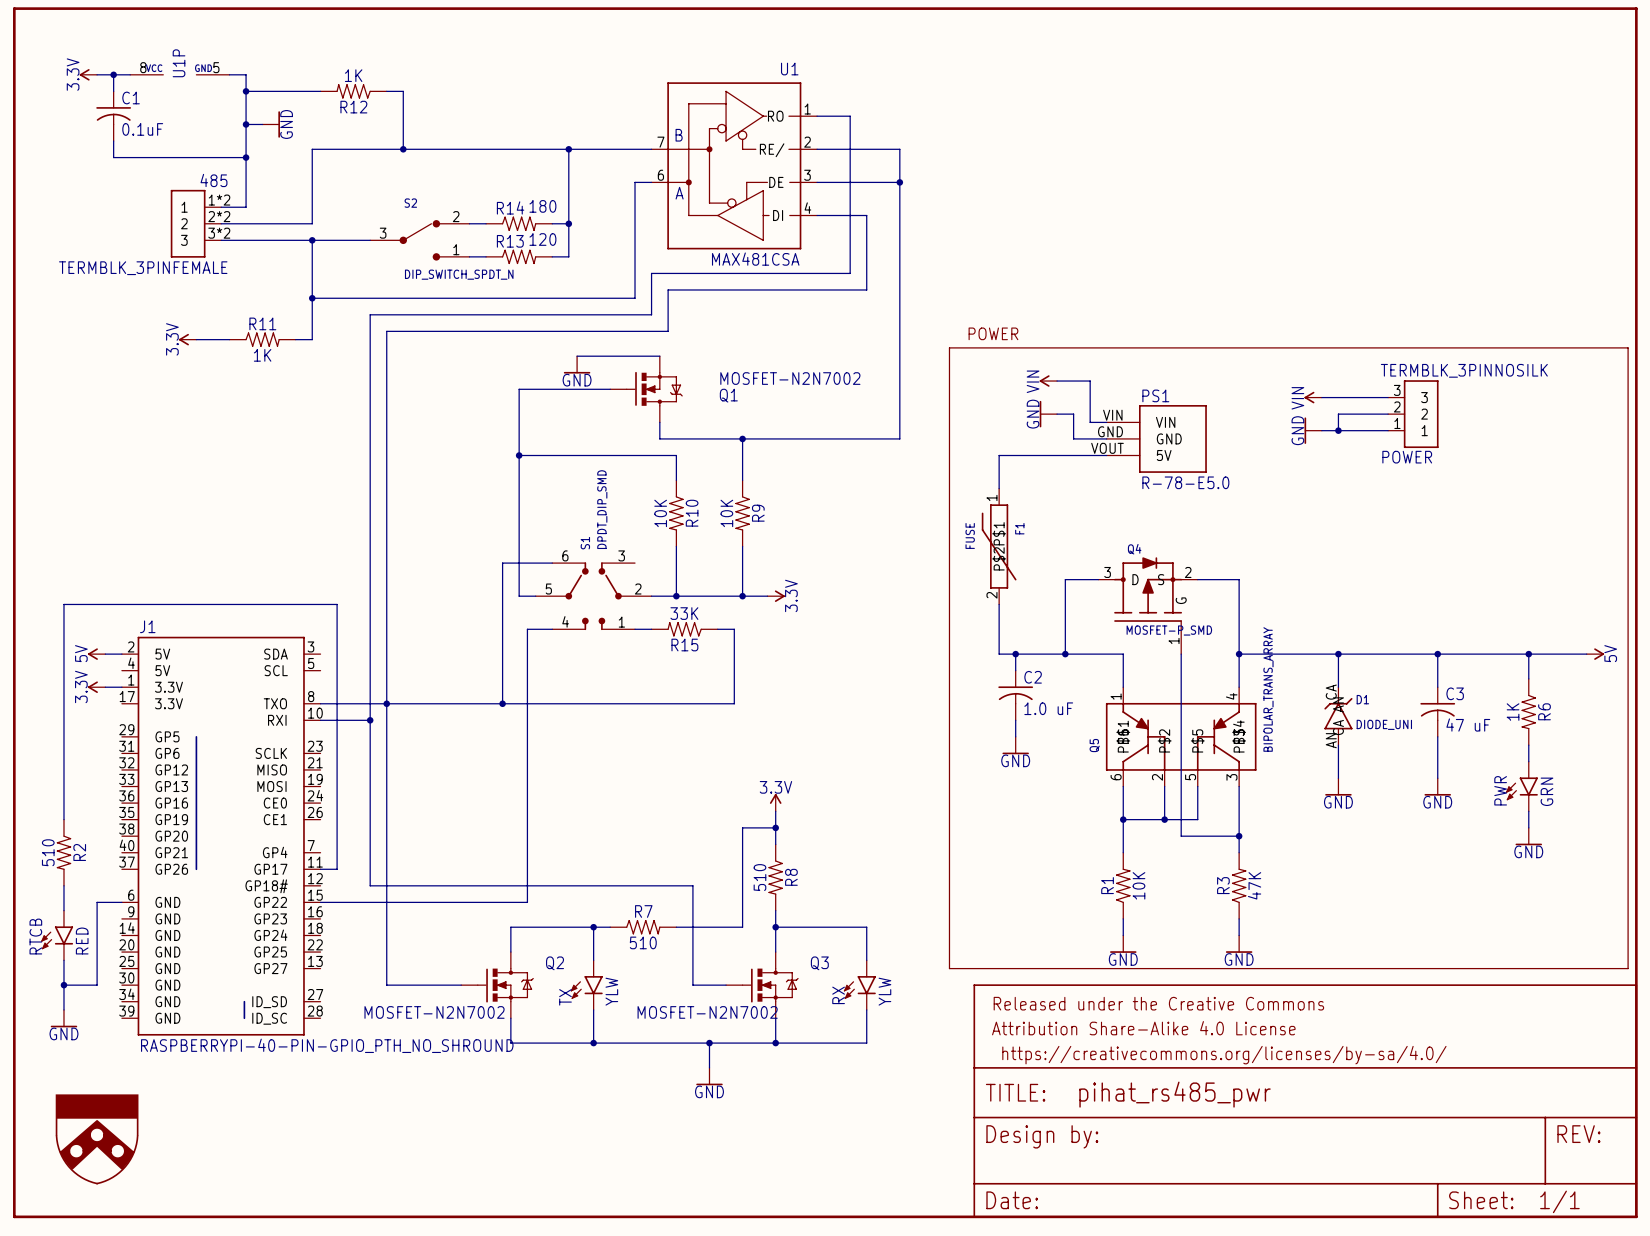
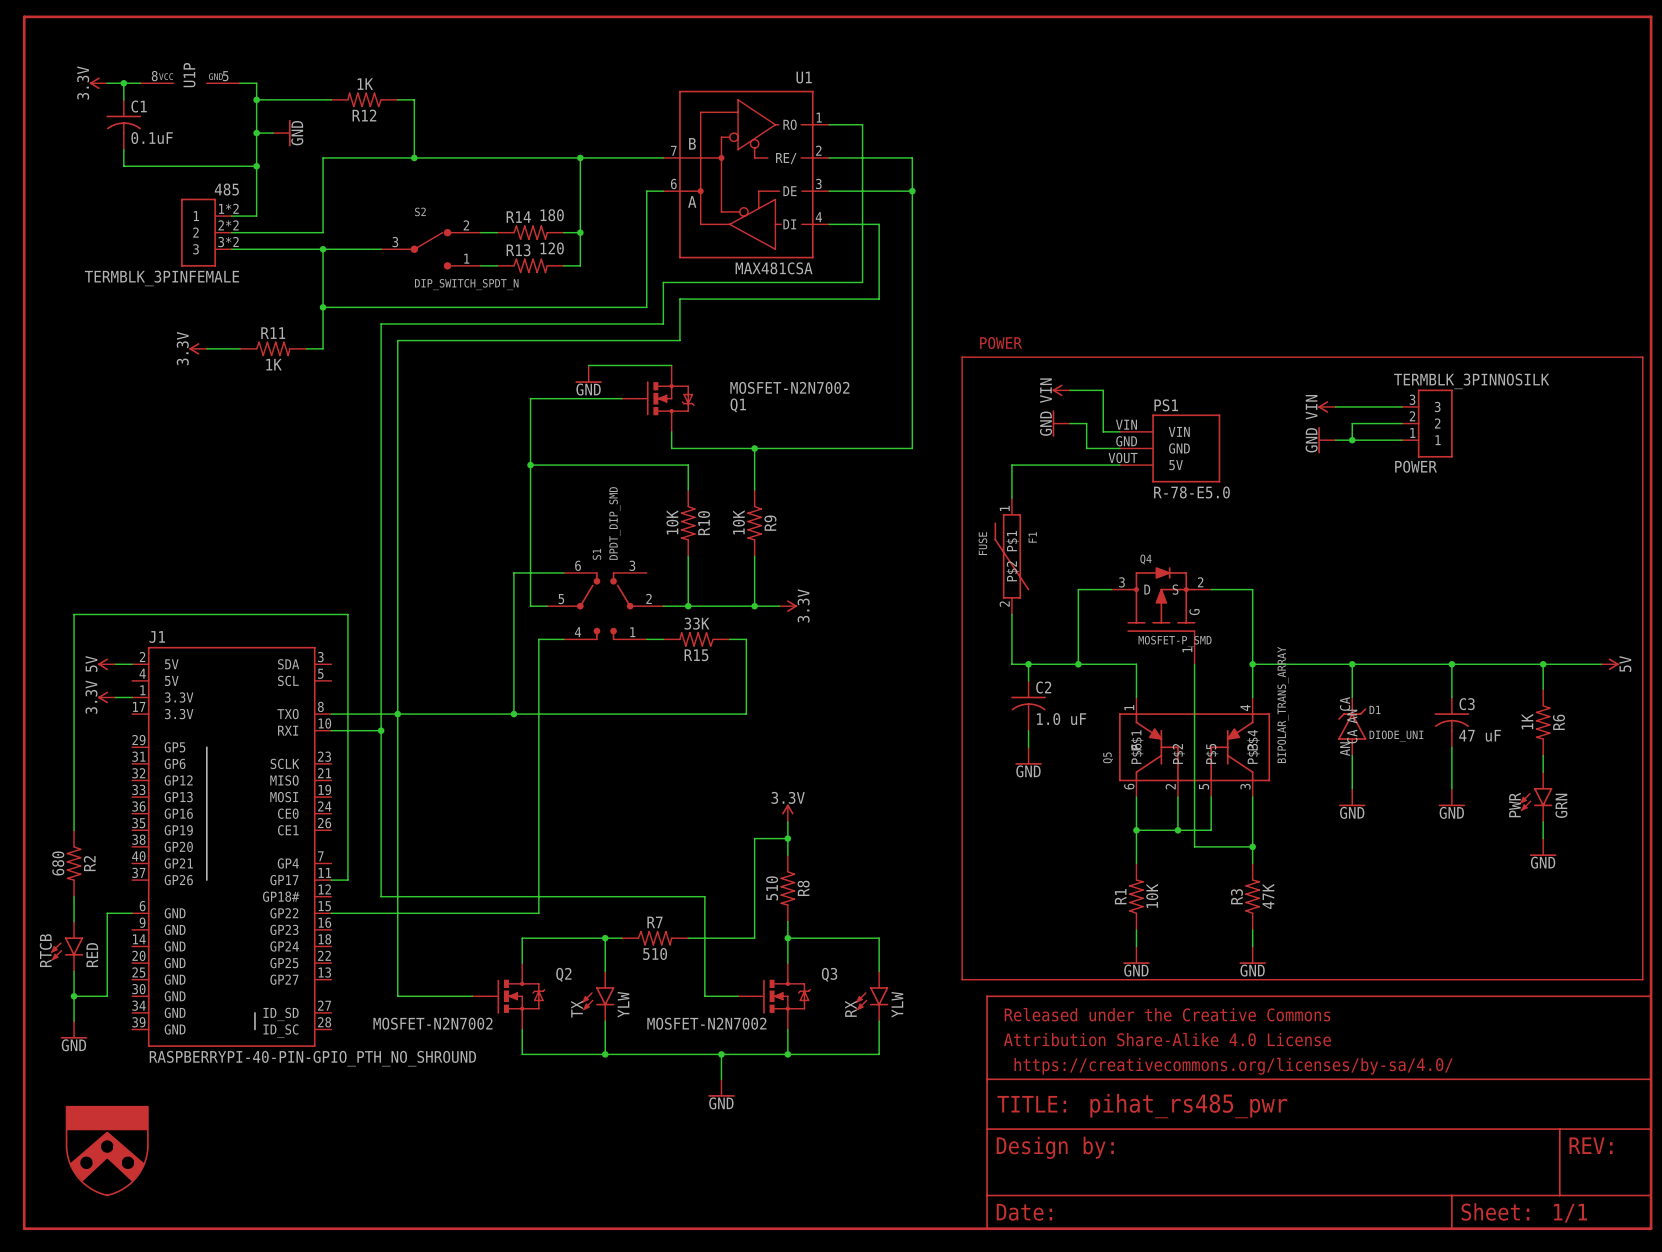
R2 value: 510 (48, 852) -> 680 (58, 863)

